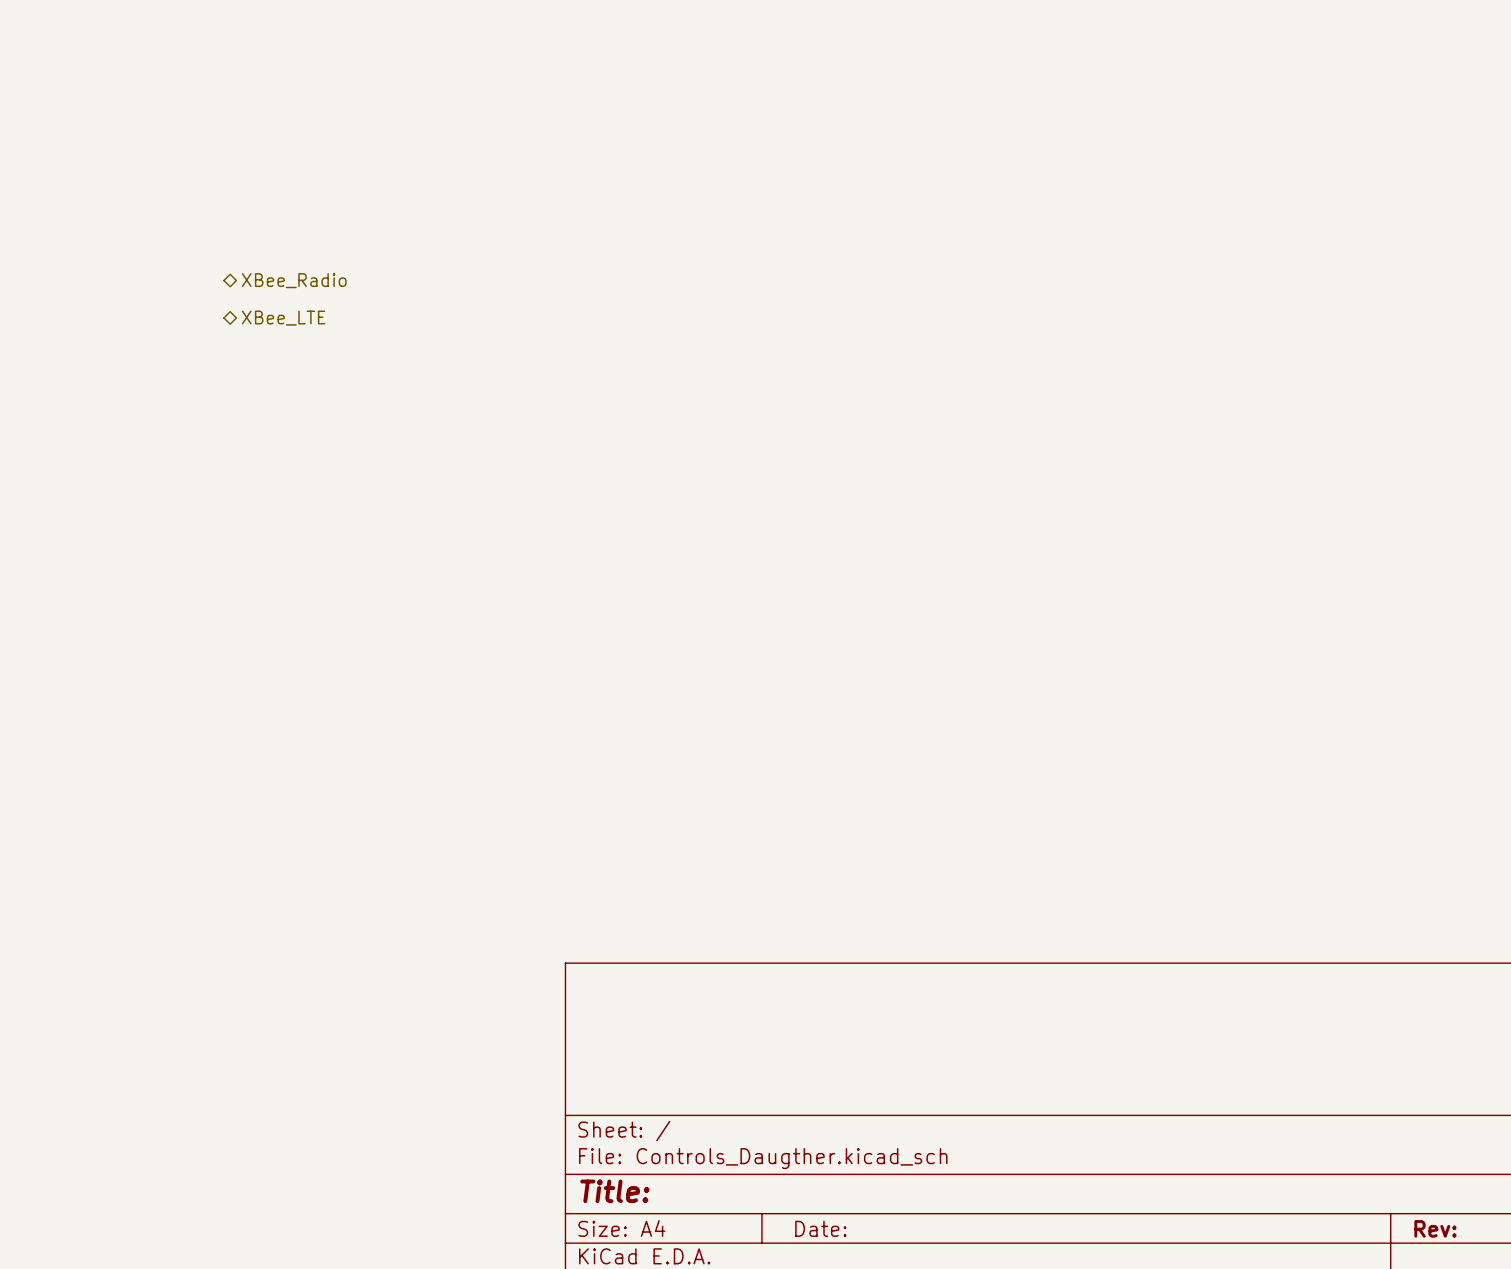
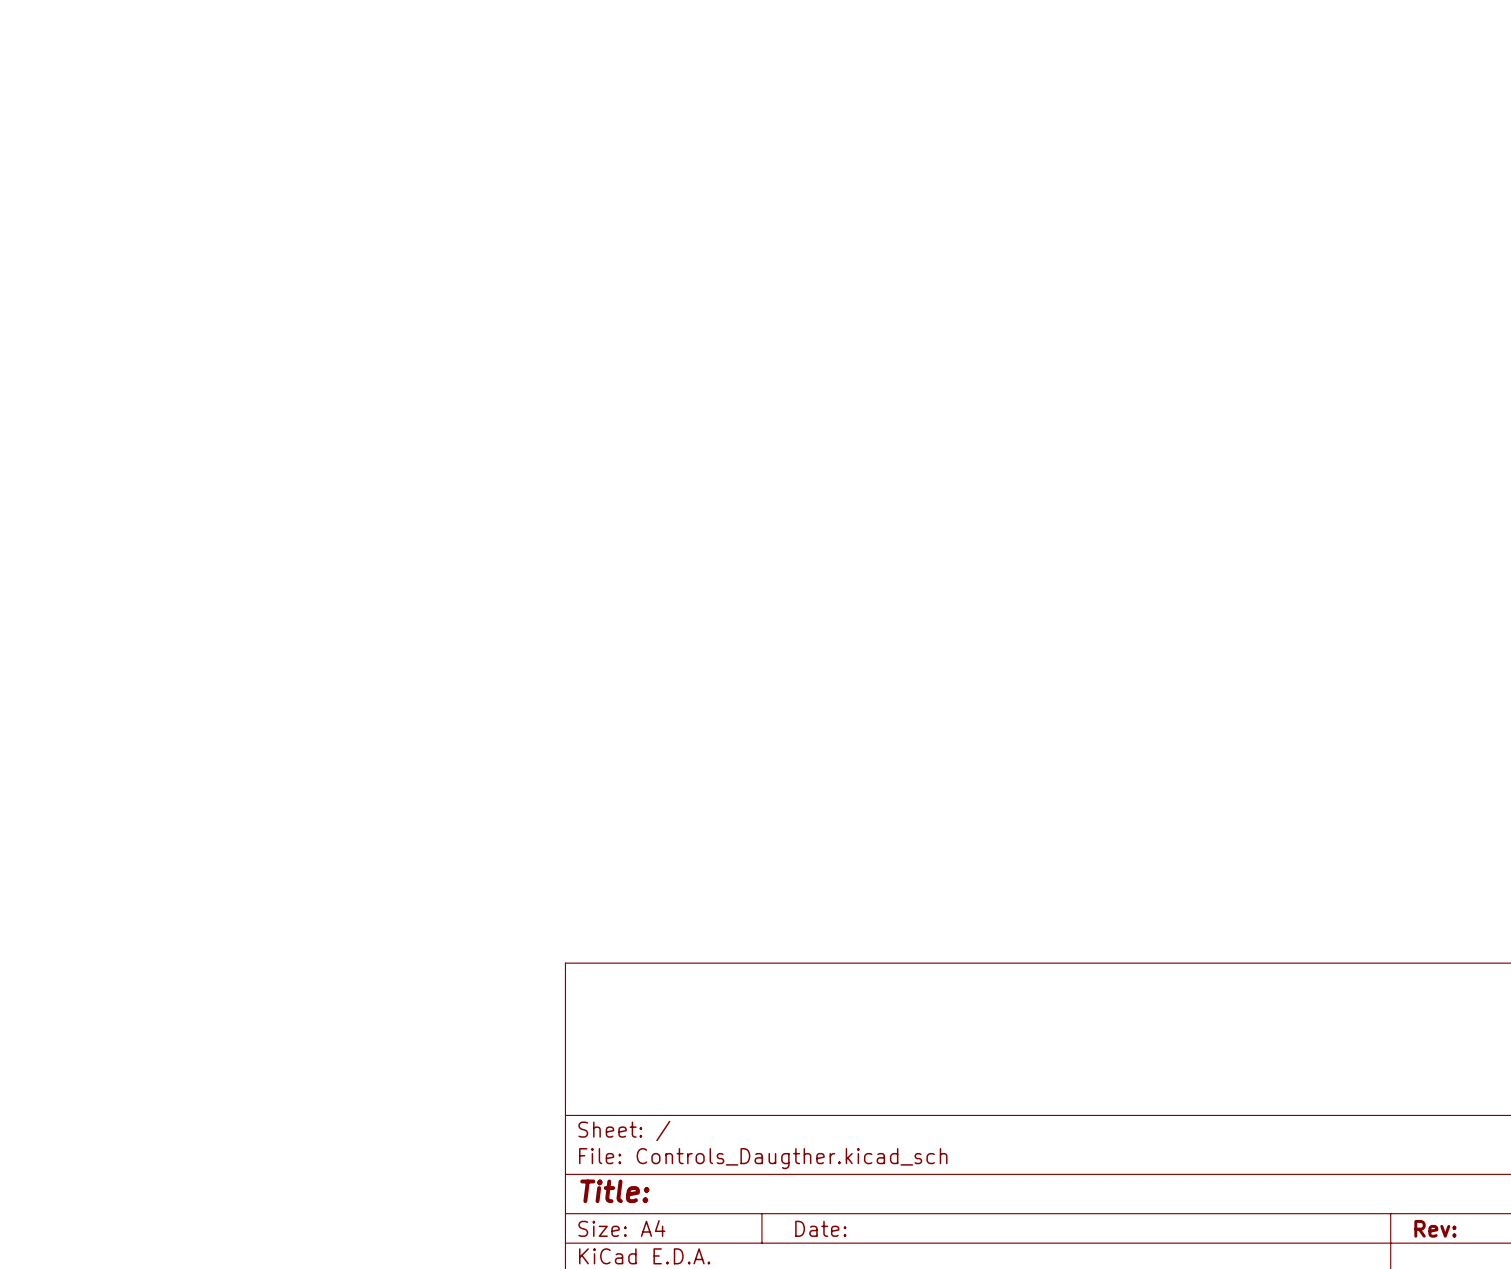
hierarchical label: XBee_Radio (294, 280) -> none
hierarchical label: XBee_LTE (283, 318) -> none

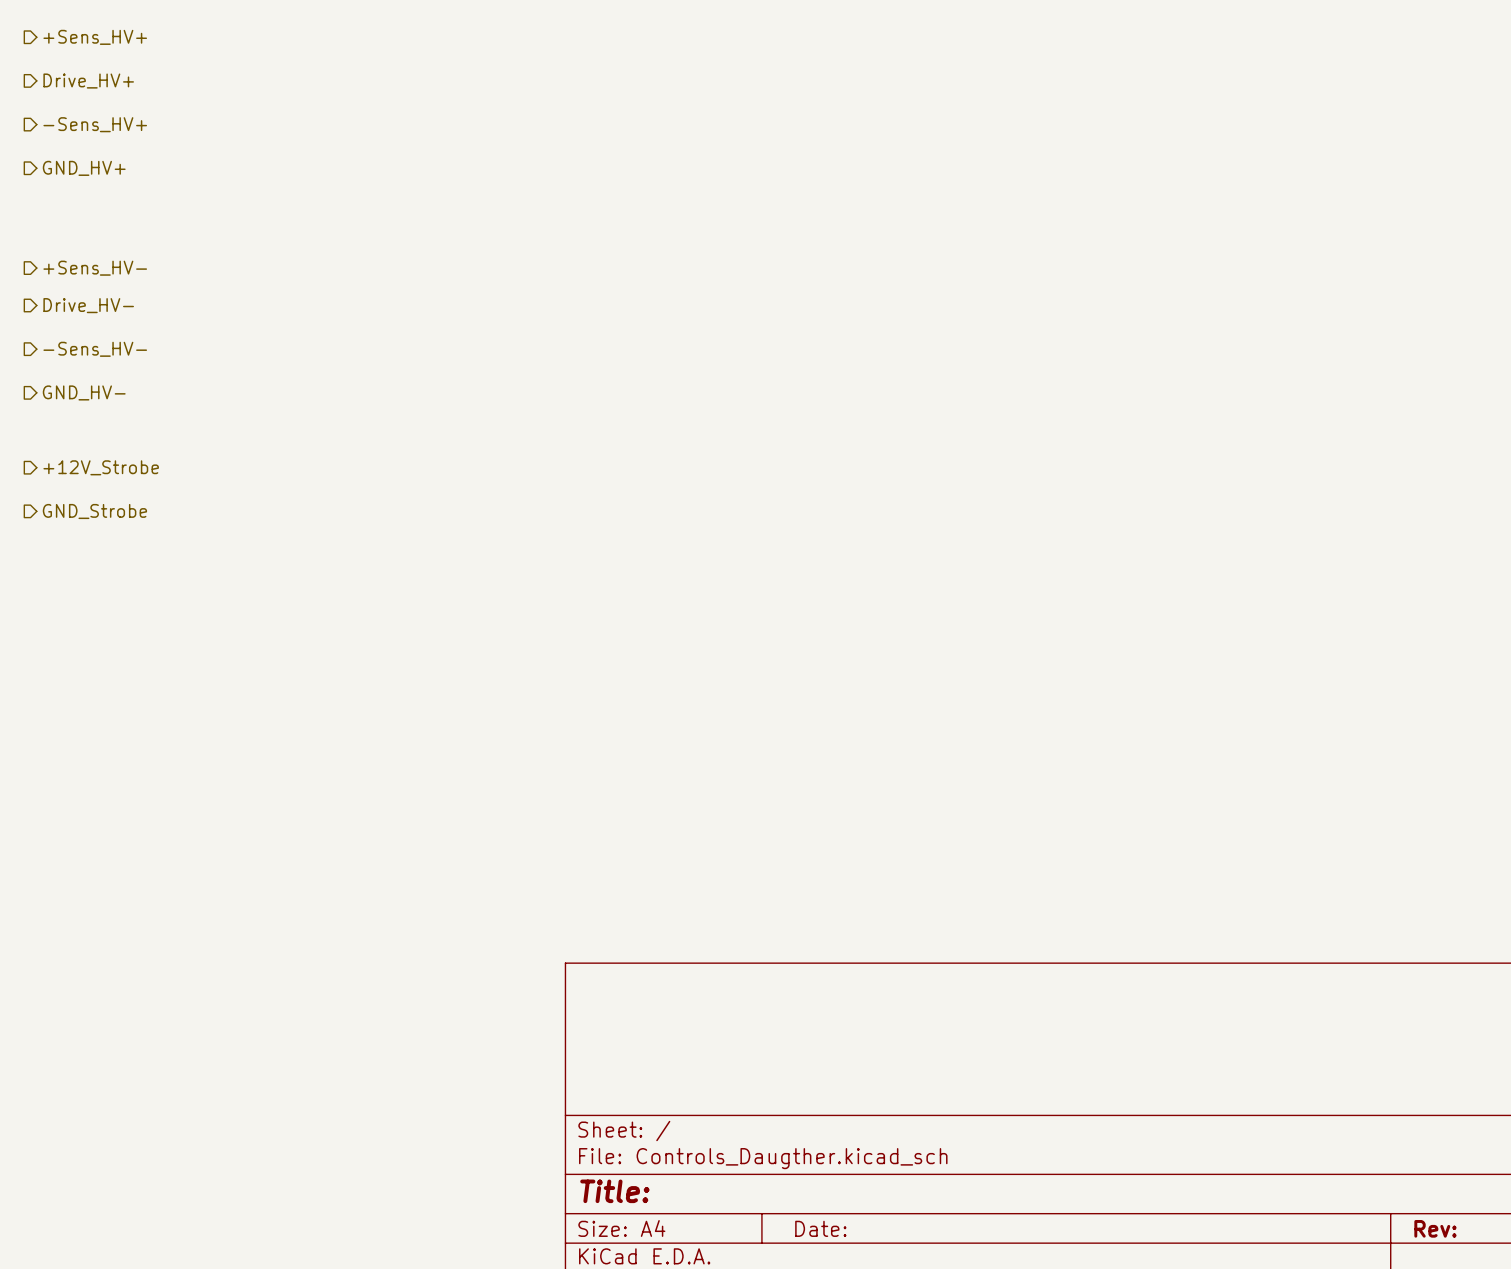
hierarchical label: none -> +Sens_HV+ (95, 37)
hierarchical label: none -> Drive_HV+ (88, 81)
hierarchical label: none -> -Sens_HV+ (95, 124)
hierarchical label: none -> GND_HV+ (84, 168)
hierarchical label: none -> +Sens_HV- (95, 268)
hierarchical label: none -> Drive_HV- (88, 305)
hierarchical label: none -> -Sens_HV- (95, 349)
hierarchical label: none -> GND_HV- (84, 392)
hierarchical label: none -> +12V_Strobe (101, 467)
hierarchical label: none -> GND_Strobe (94, 511)

